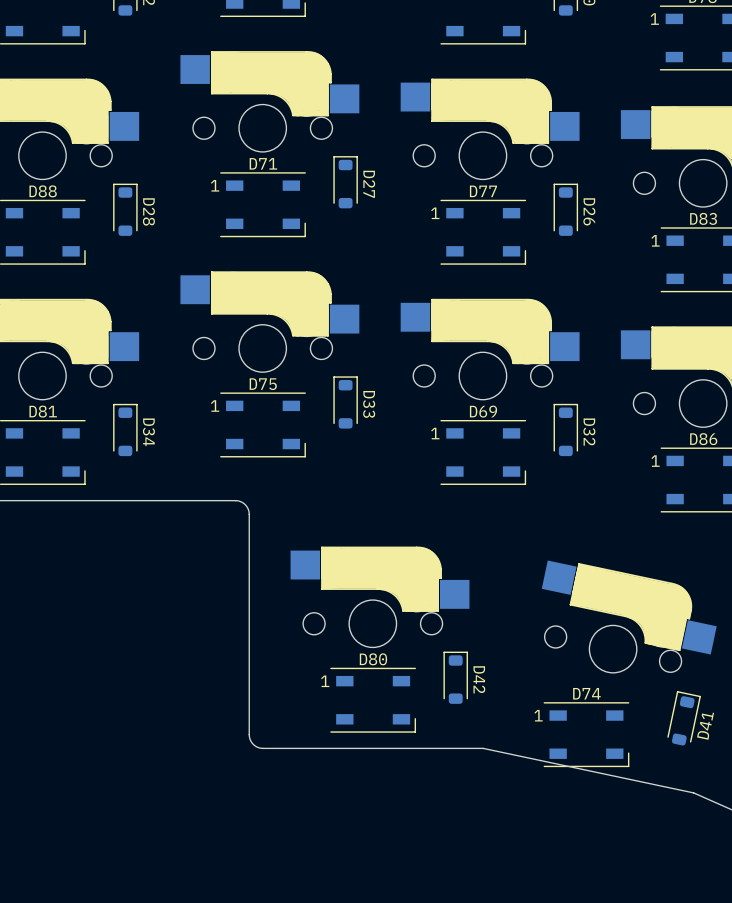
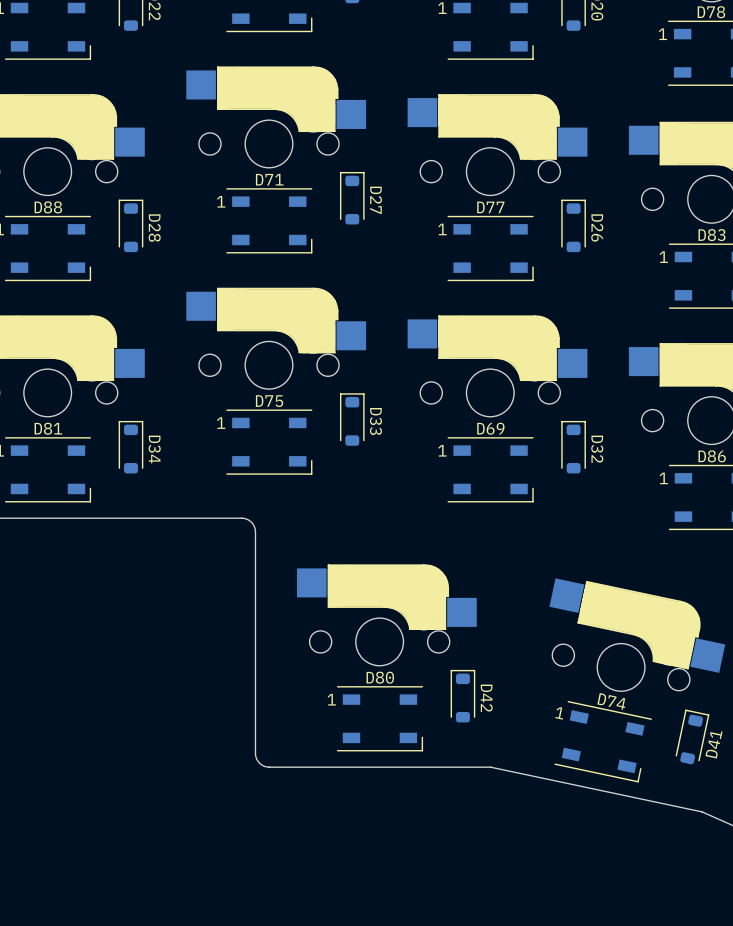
D74 rotation: 0° (586, 734) -> 11.9° clockwise (603, 741)

